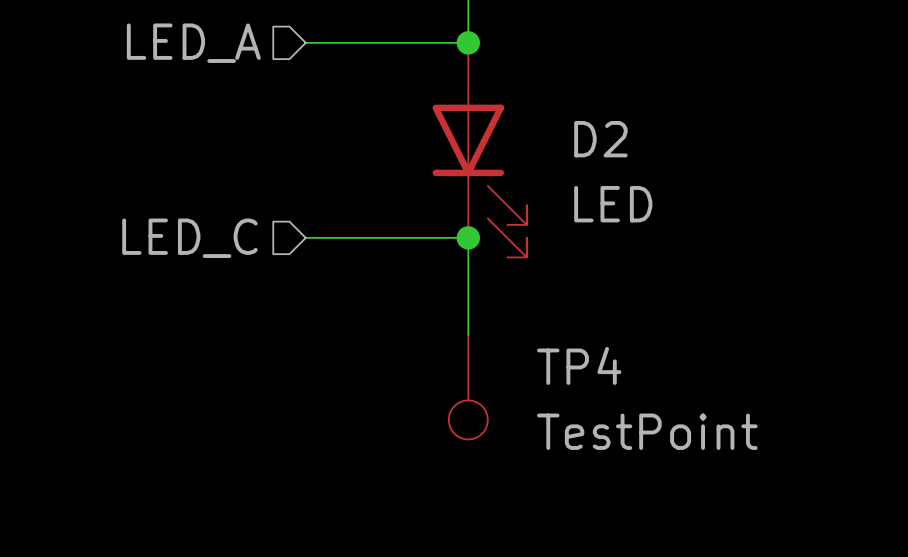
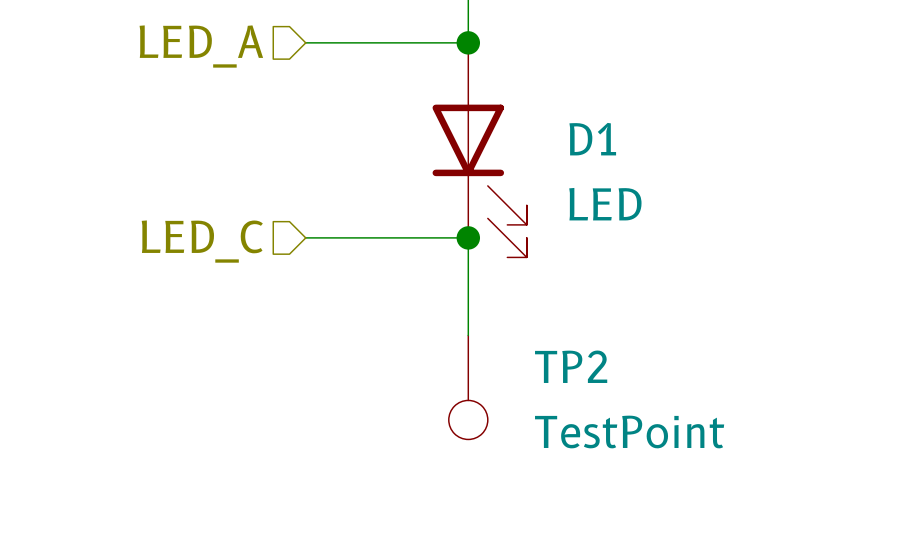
D2 name: D2 (600, 139) -> D1 (592, 139)
TP4 name: TP4 (579, 365) -> TP2 (571, 366)

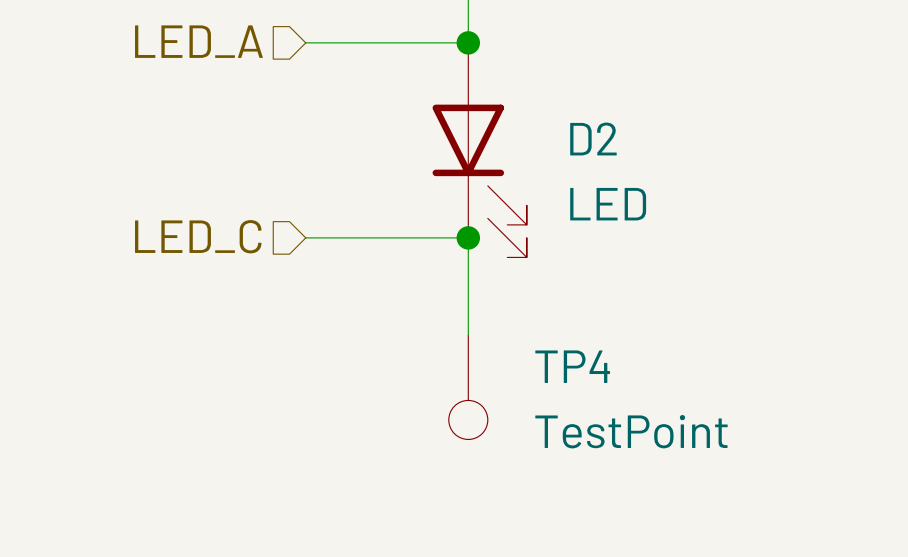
D1 name: D1 (592, 139) -> D2 (593, 138)
TP2 name: TP2 (571, 366) -> TP4 (572, 366)

